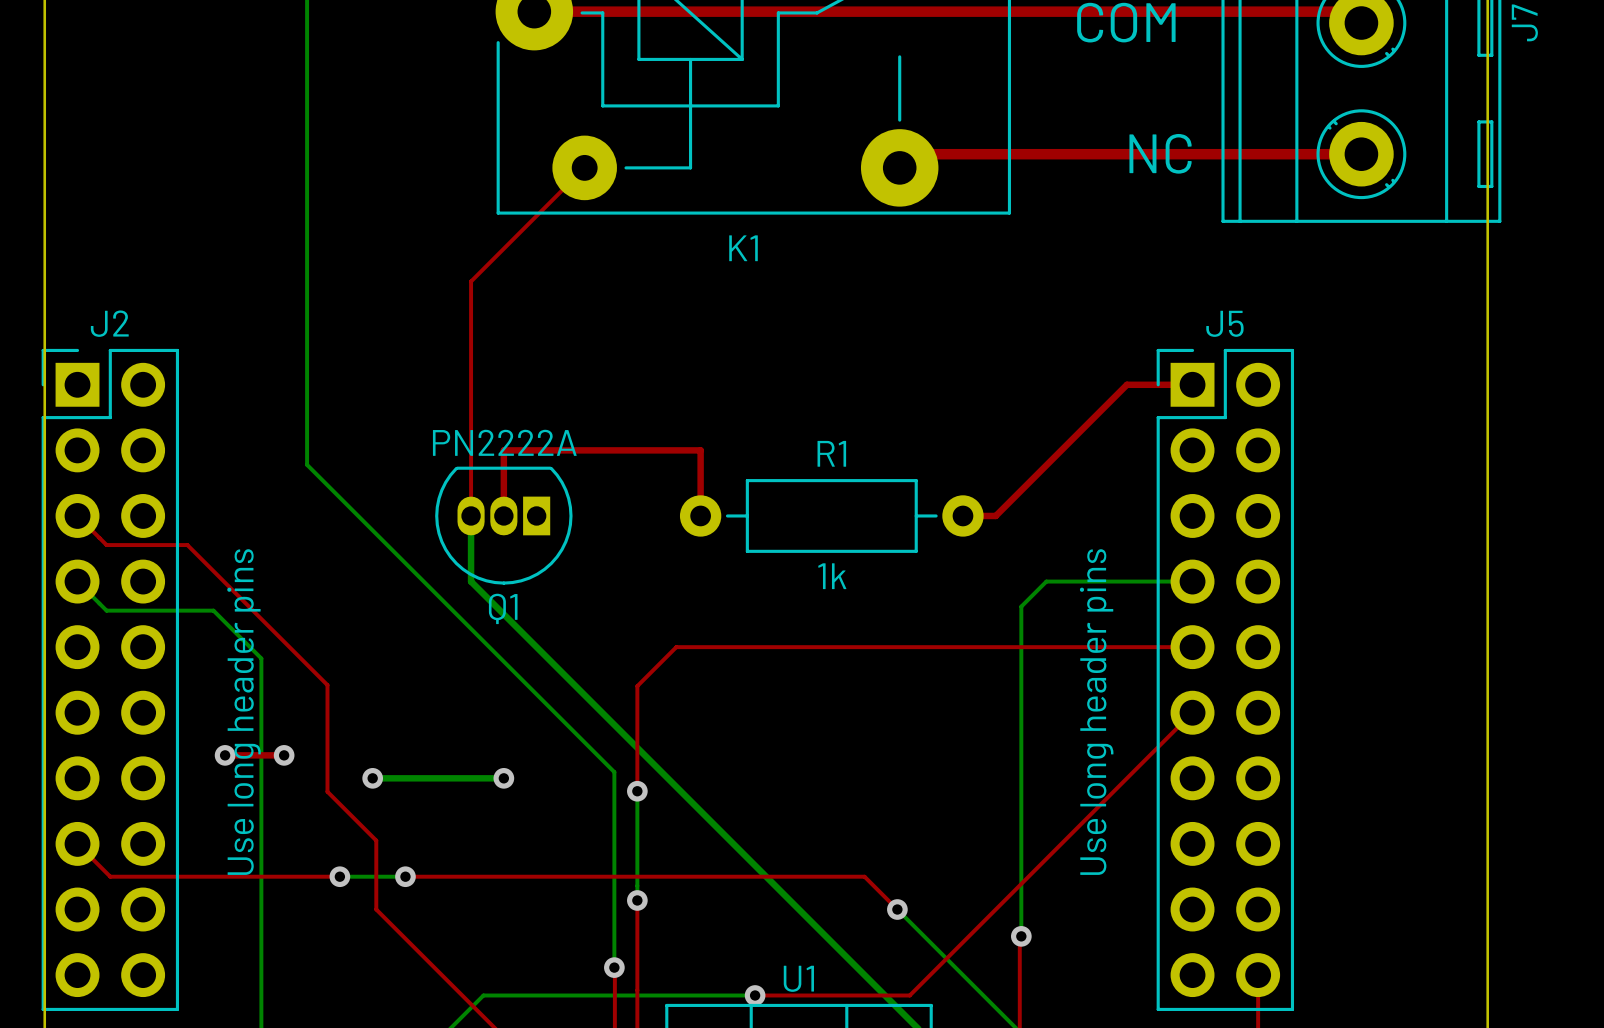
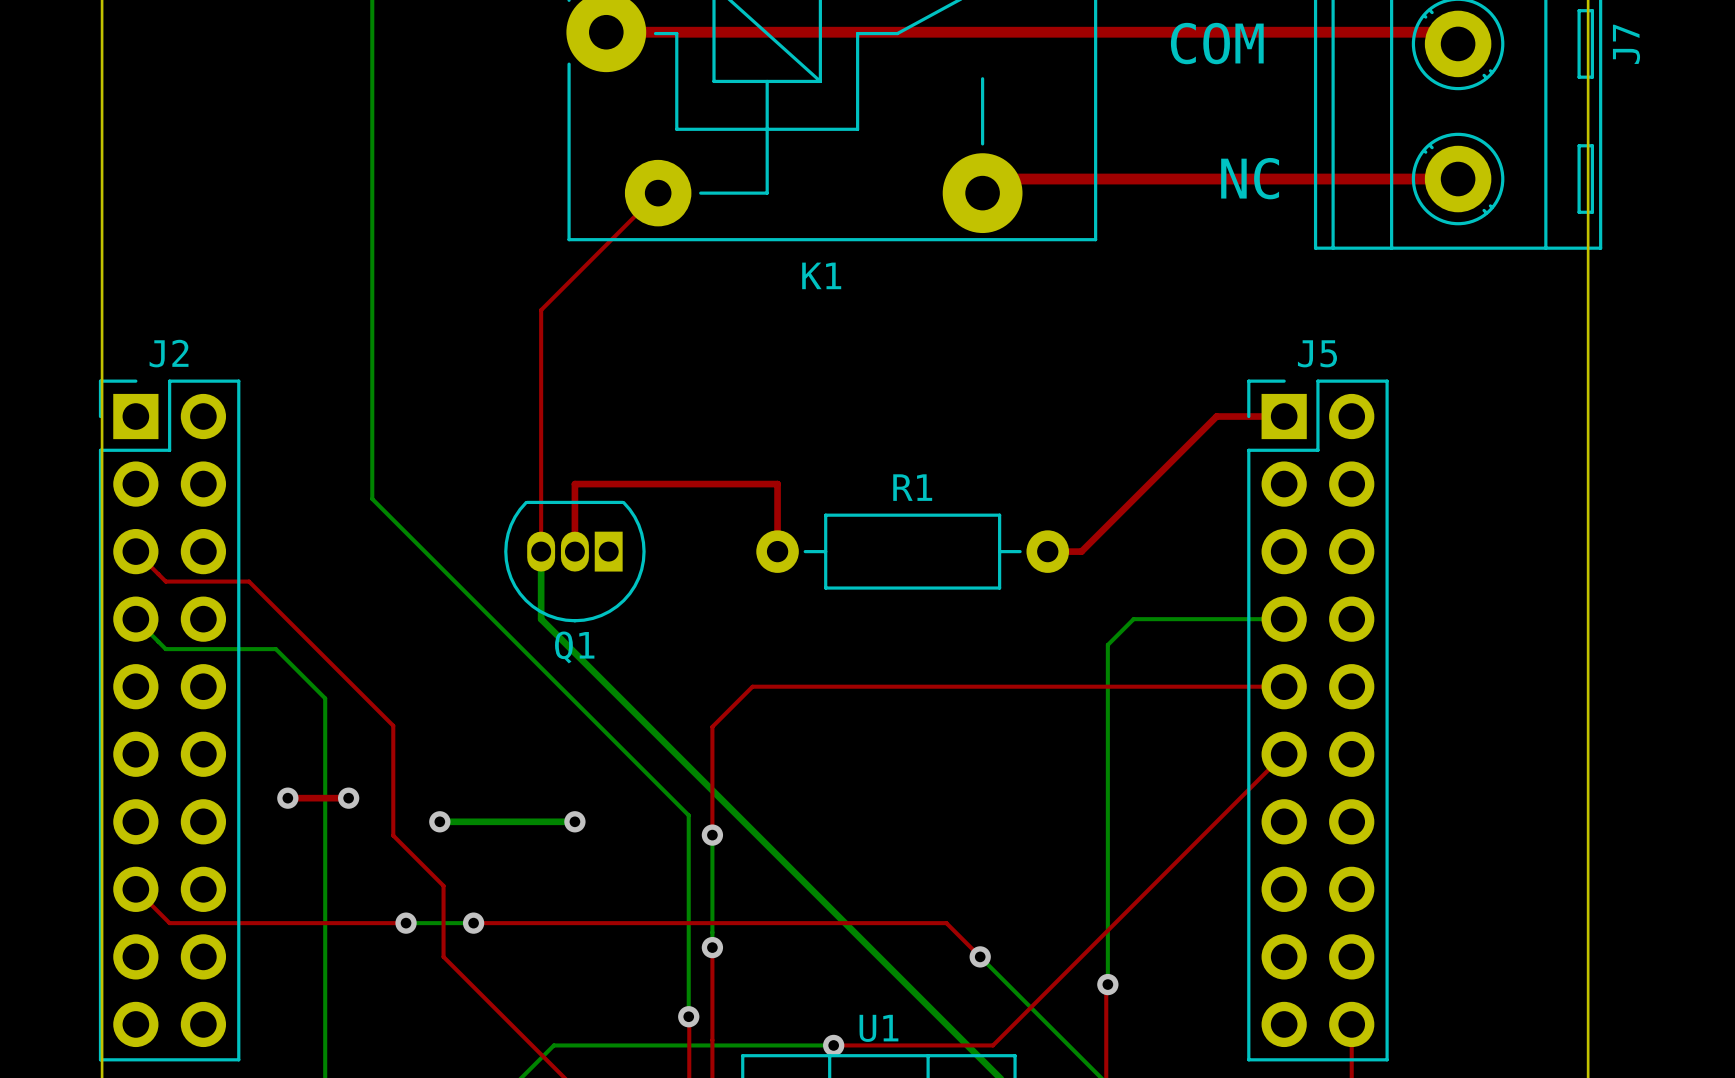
Q1 value: PN2222A (504, 442) -> none
R1 value: 1k (832, 576) -> none
text: Use long header pins (244, 712) -> none
text: Use long header pins (1096, 712) -> none

